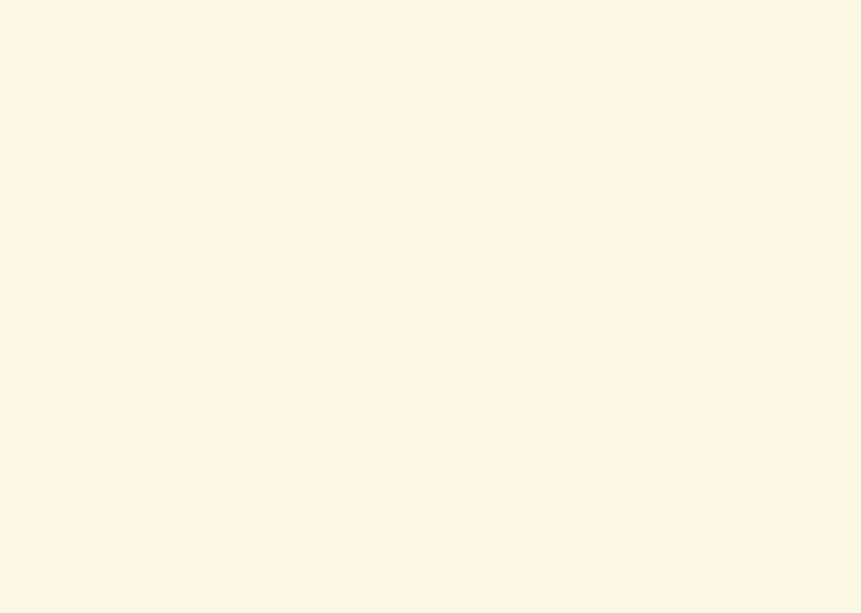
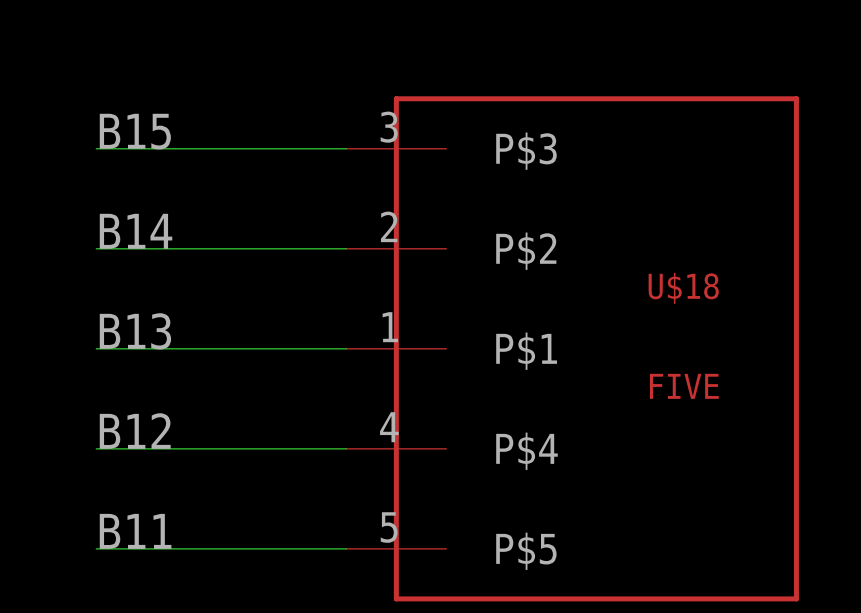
label: none -> B15 (135, 131)
wire: none -> (96, 148) (346, 148)
label: none -> B14 (136, 231)
wire: none -> (96, 248) (346, 248)
label: none -> B13 (135, 331)
wire: none -> (96, 348) (346, 348)
U$18: none -> FIVE (572, 348)
label: none -> B12 (135, 431)
wire: none -> (96, 448) (346, 448)
label: none -> B11 (135, 531)
wire: none -> (96, 548) (346, 548)

